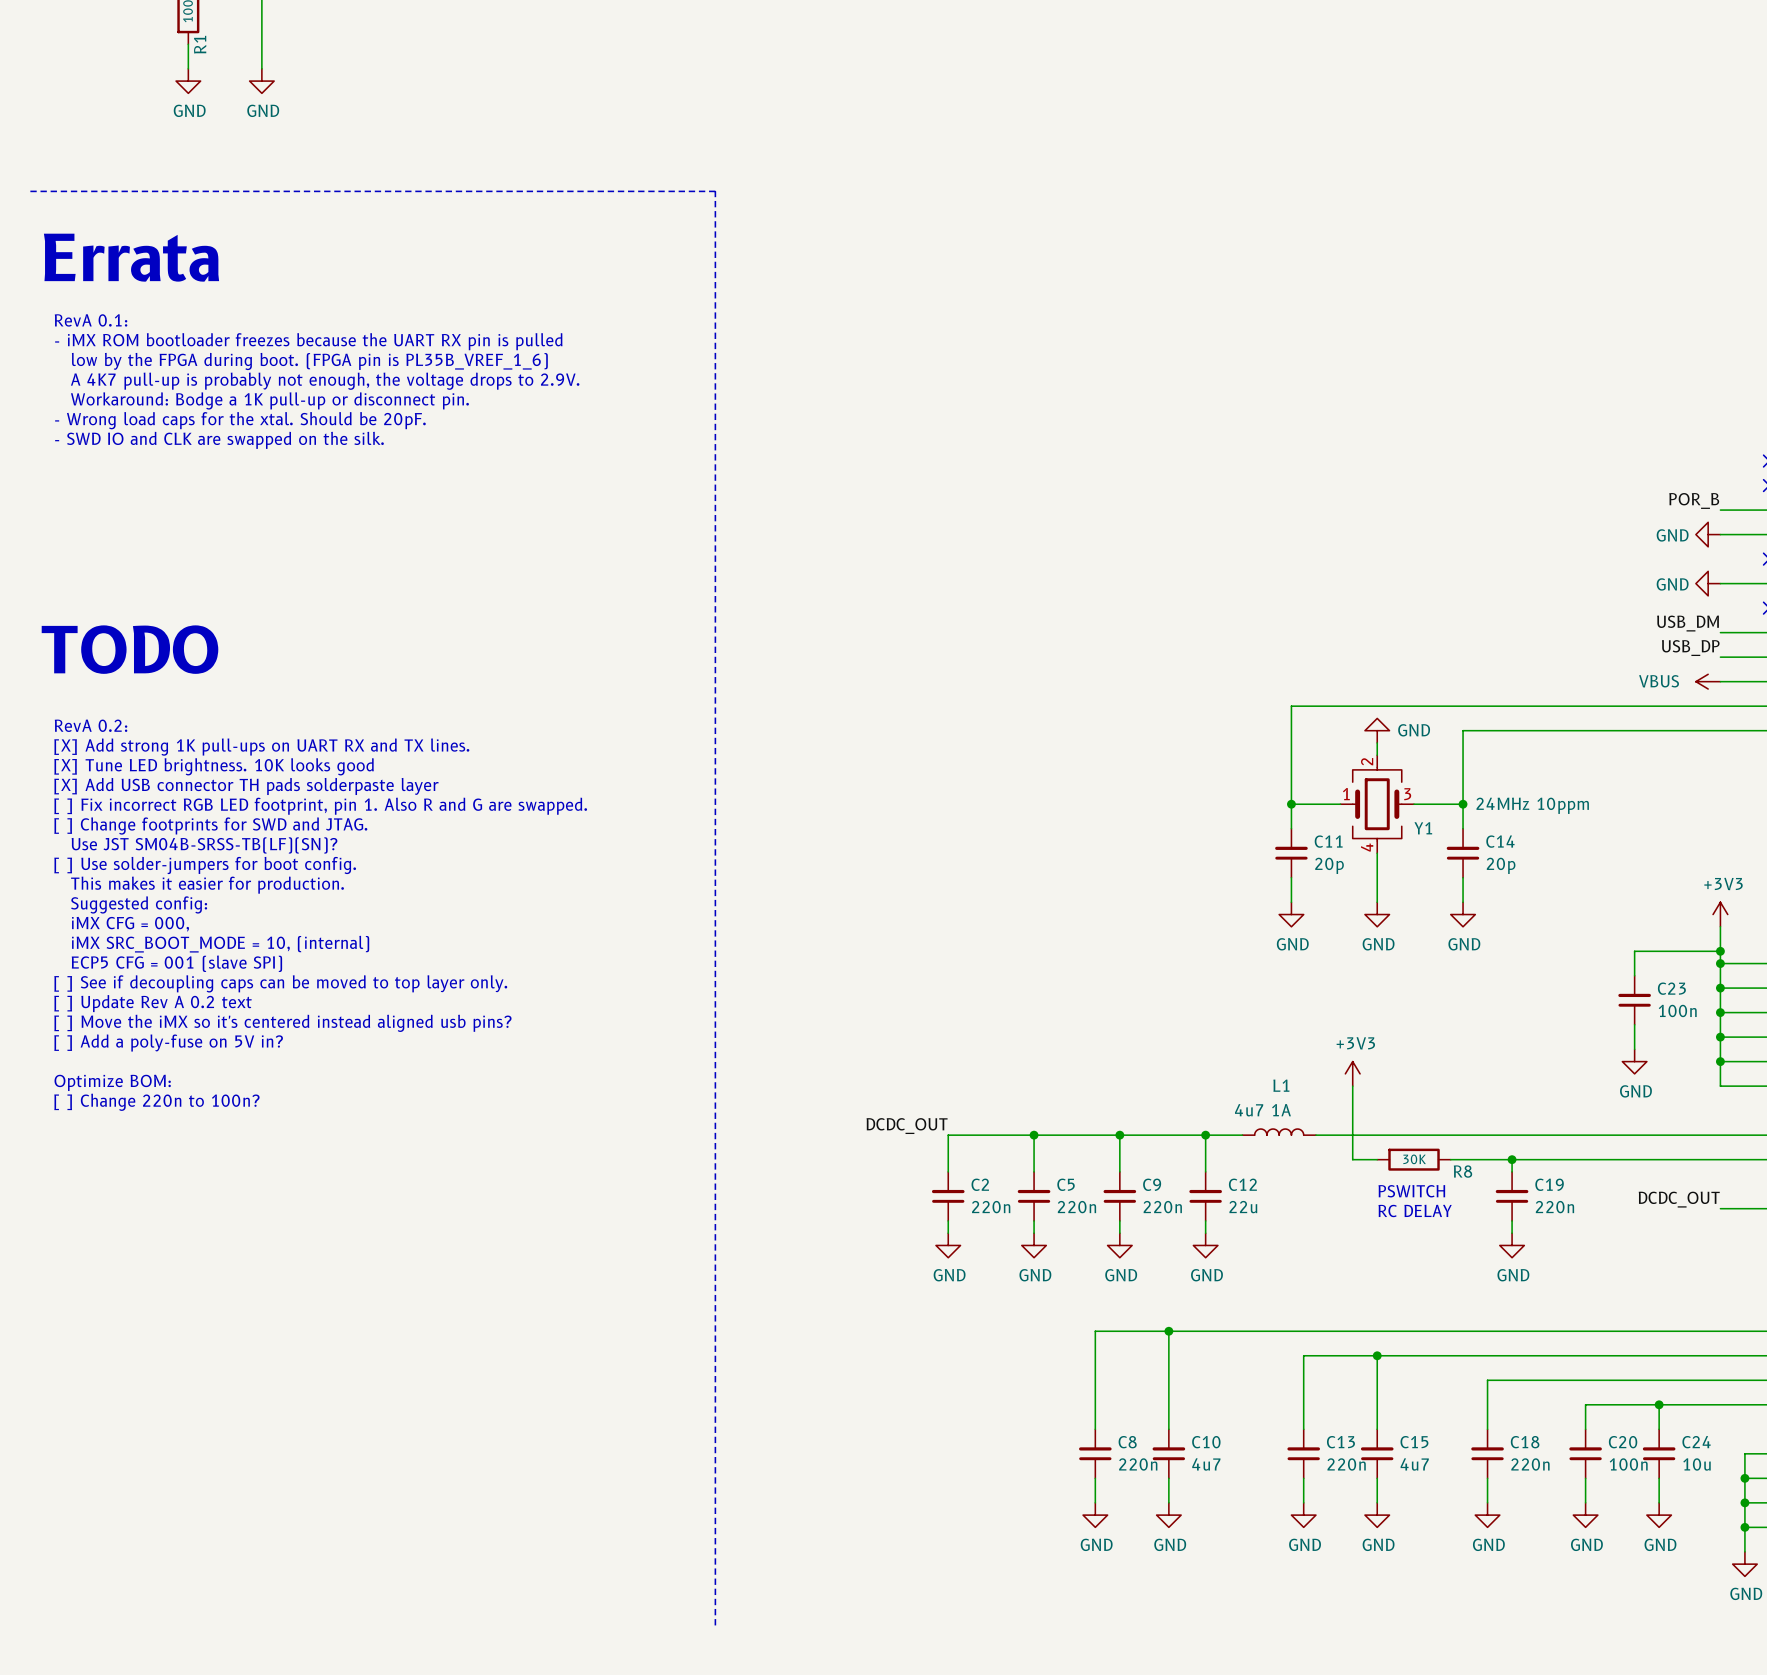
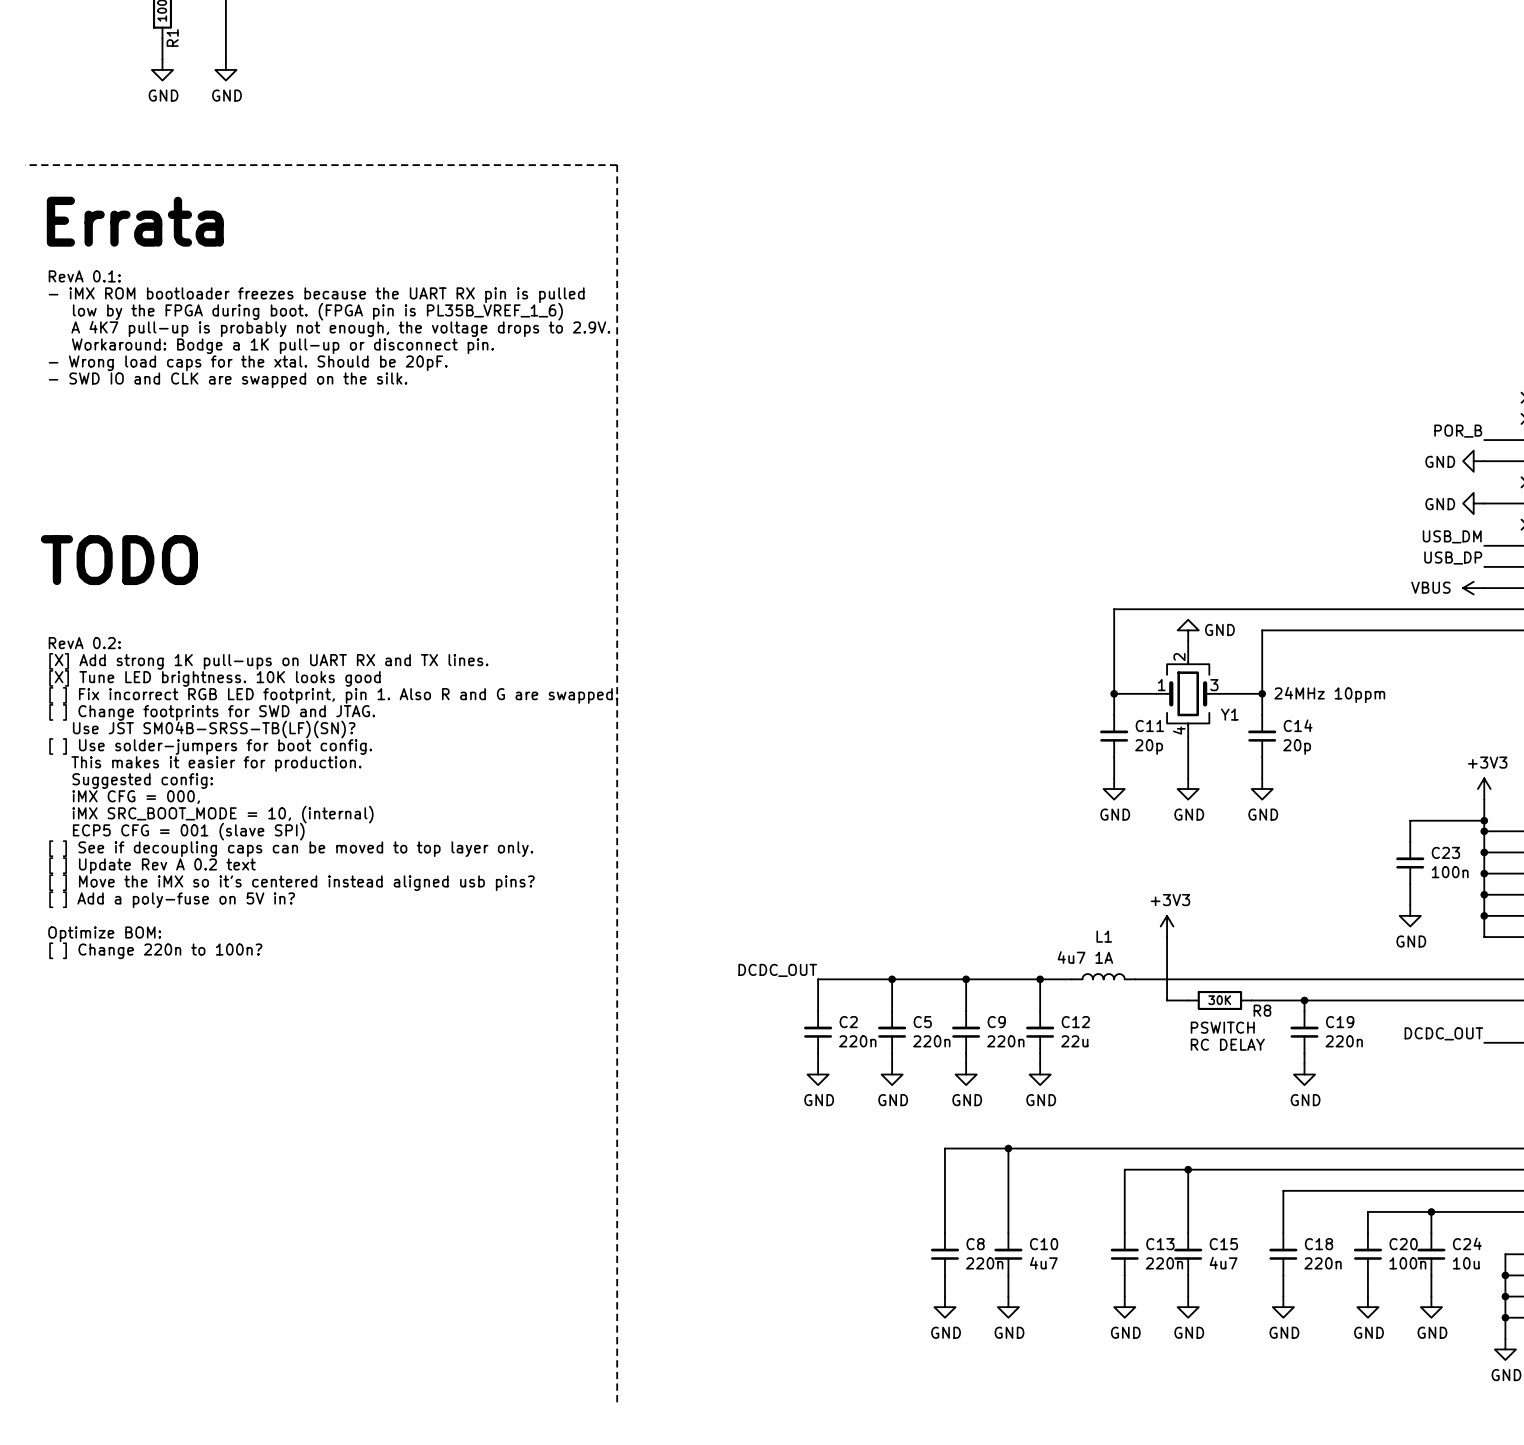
text: RevA 0.2: (91, 725) -> none
text: [X] Add strong 1K pull-ups on UART RX and TX lines. (261, 747) -> RevA 0.2: (84, 643)
text: [X] Tune LED brightness. 10K looks good (214, 766) -> [X] Add strong 1K pull-ups on UART RX and TX lines. (268, 661)
text: [X] Add USB connector TH pads solderpaste layer (246, 786) -> [X] Tune LED brightness. 10K looks good (214, 678)

